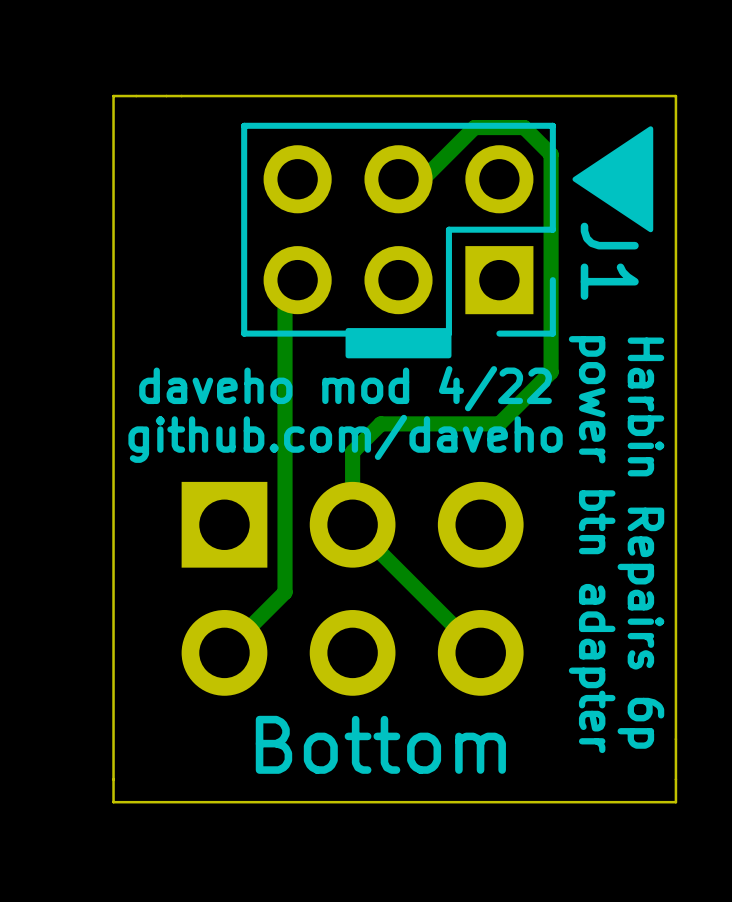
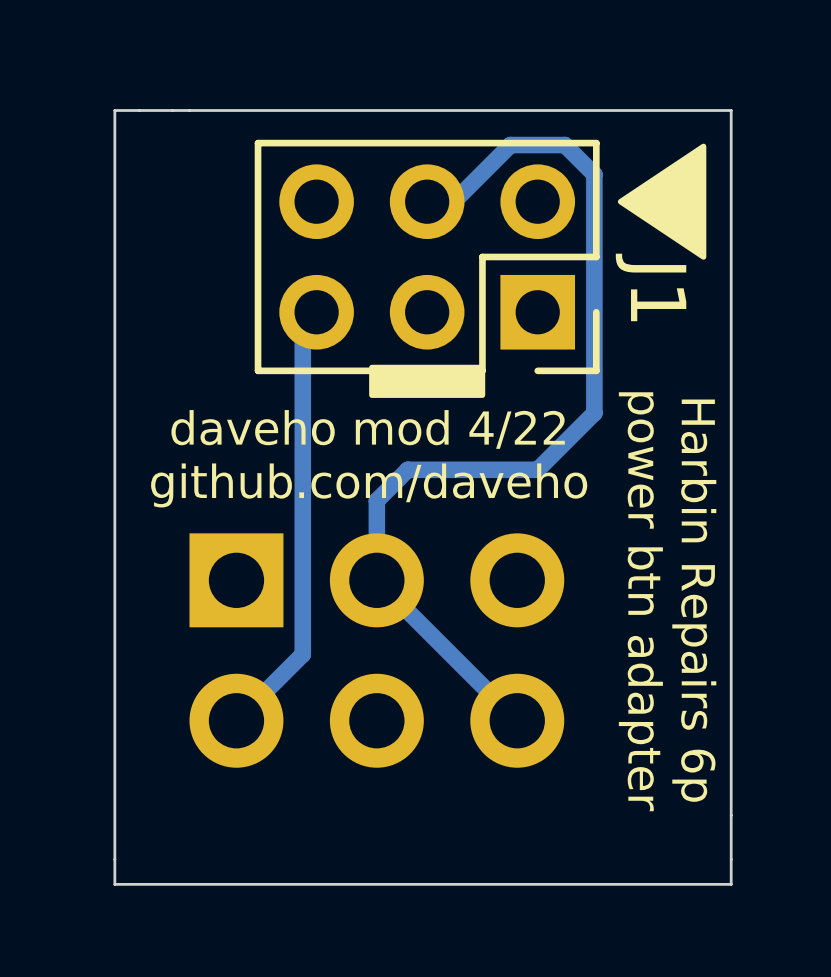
text: Bottom (380, 744) -> none

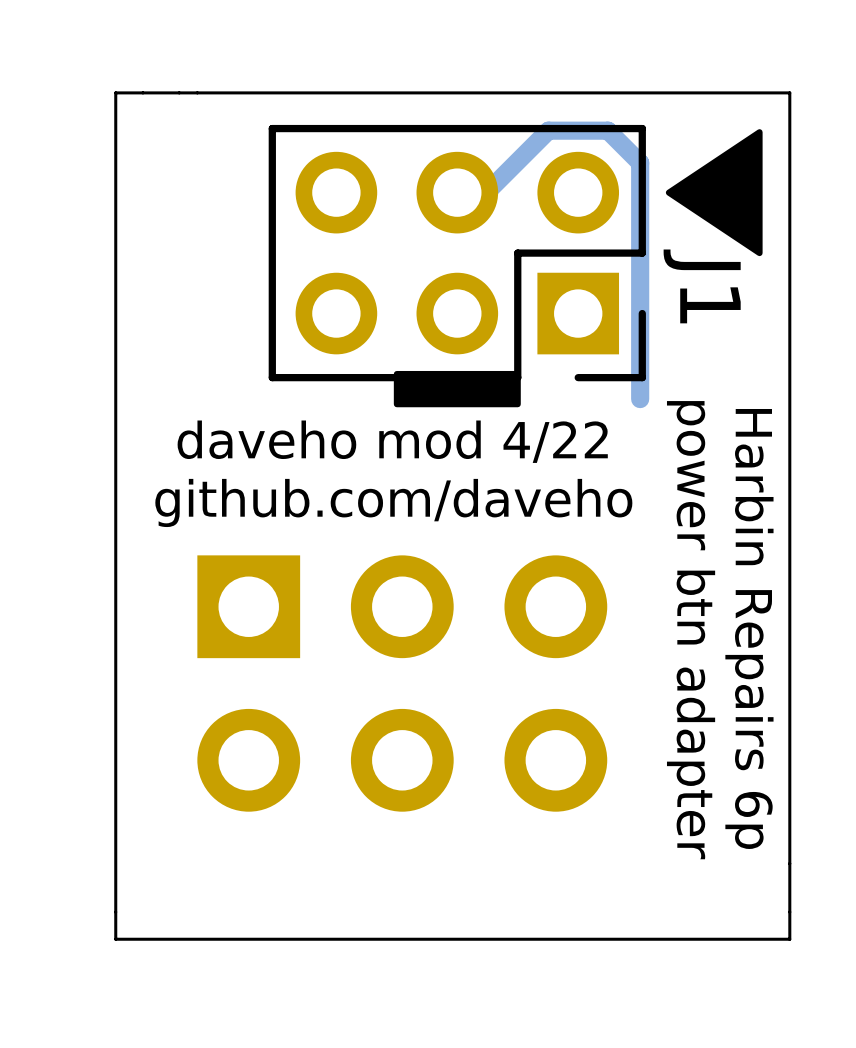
track: (316, 312) (302, 326) (302, 654) (236, 720) -> none
track: (594, 390) (594, 413) (537, 469) (407, 469) (376, 500) (376, 580) (517, 720) -> none

